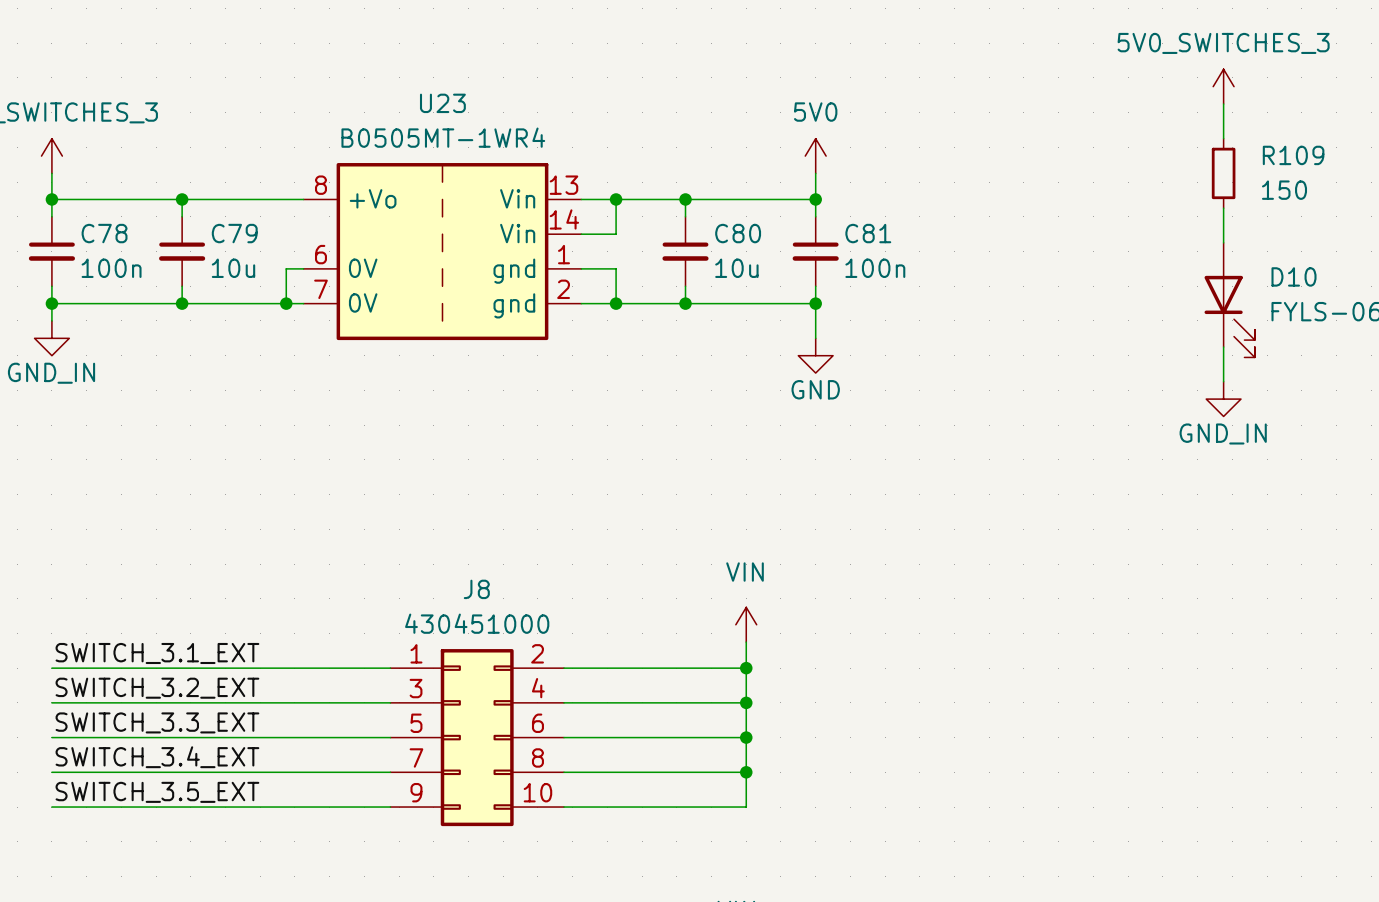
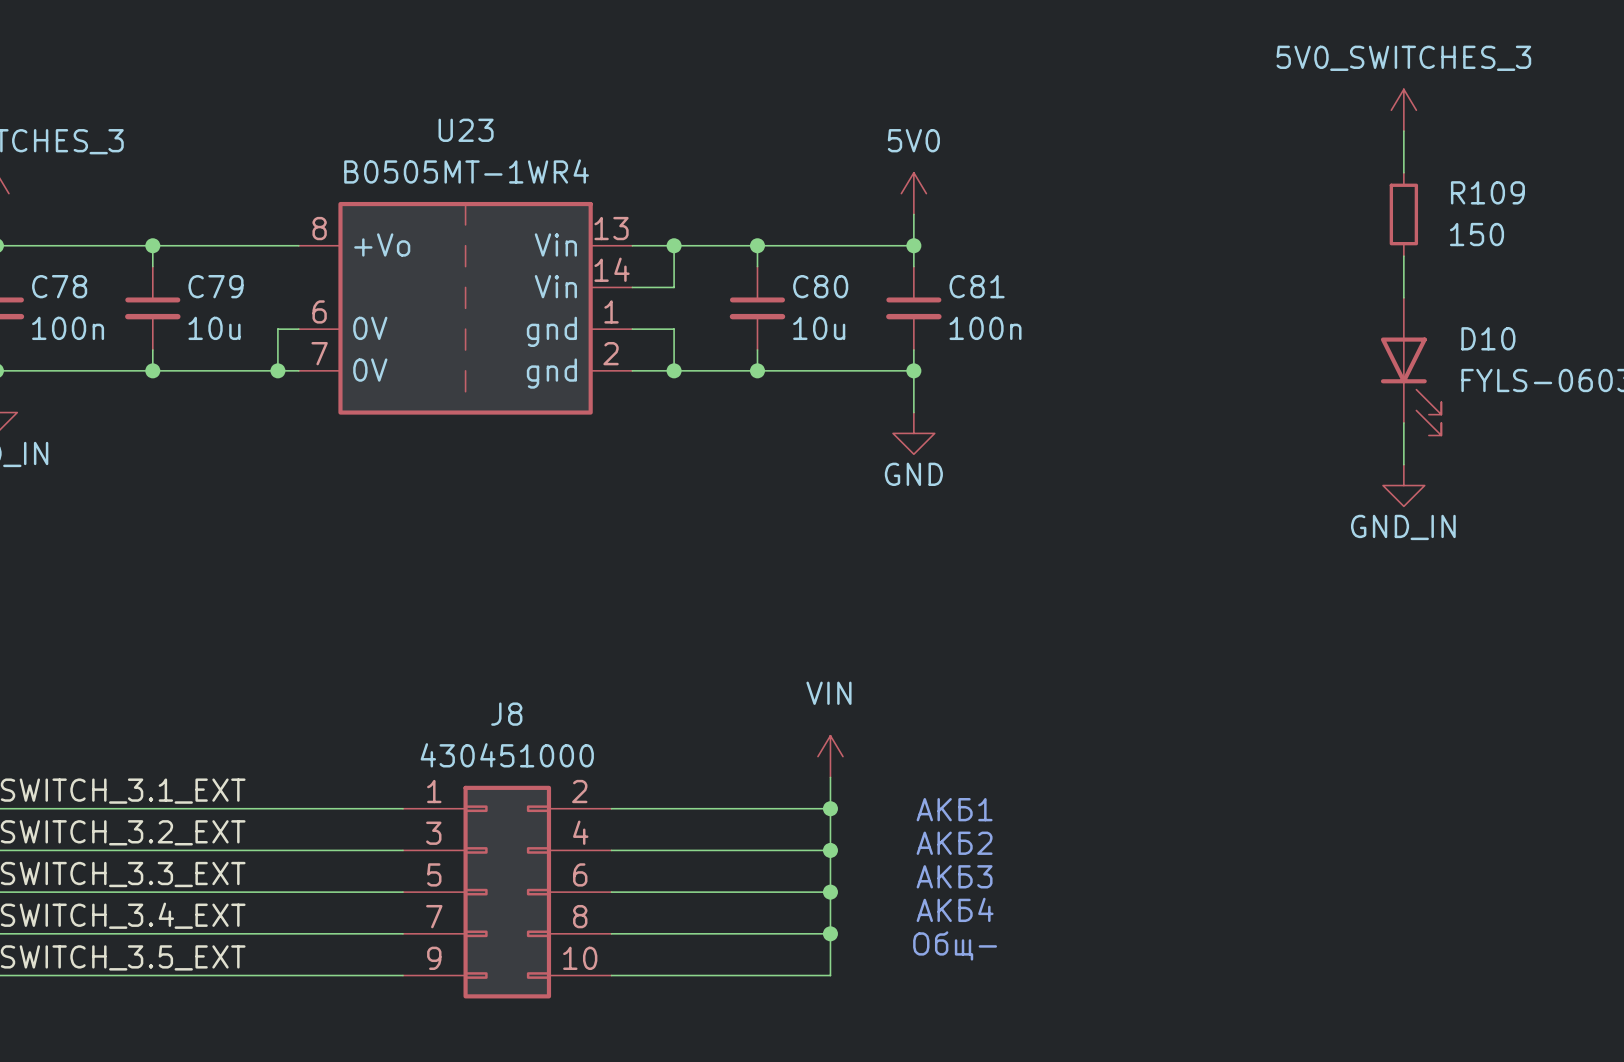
text: none -> АКБ1 (954, 809)
text: none -> АКБ2 (954, 843)
text: none -> АКБ3 (954, 876)
text: none -> АКБ4 (955, 909)
text: none -> Общ- (955, 945)

